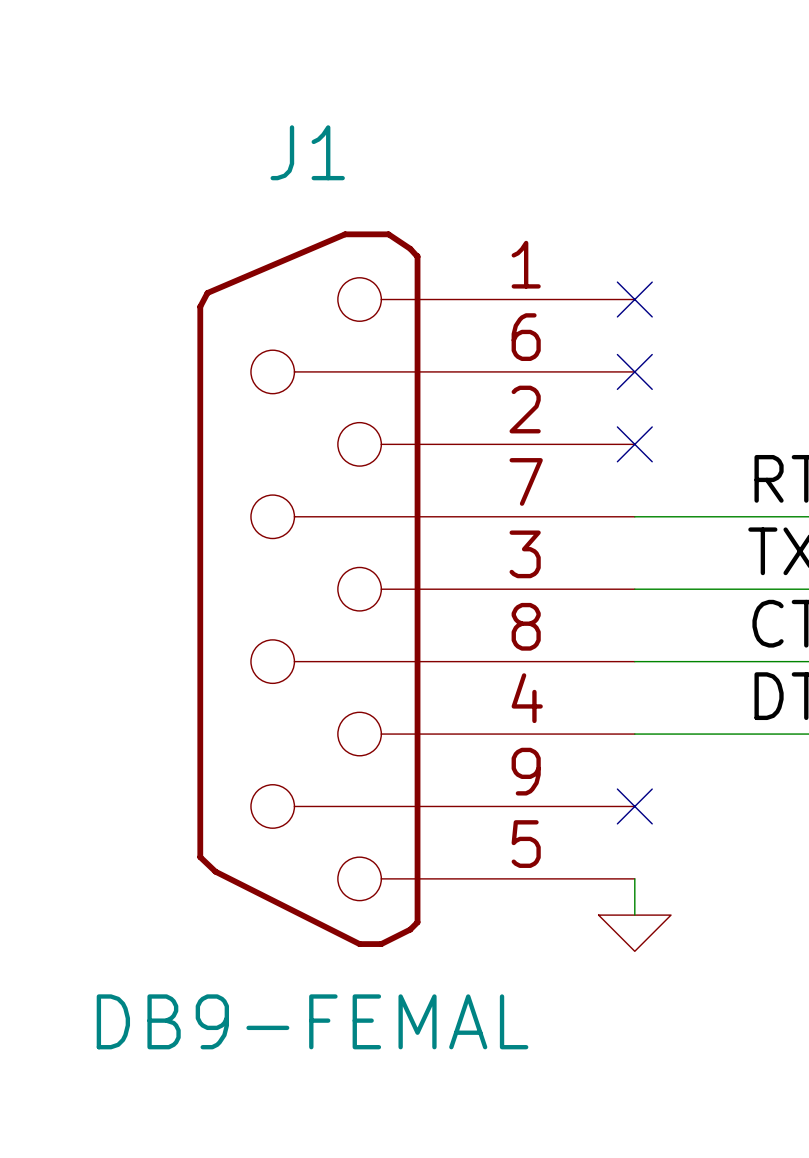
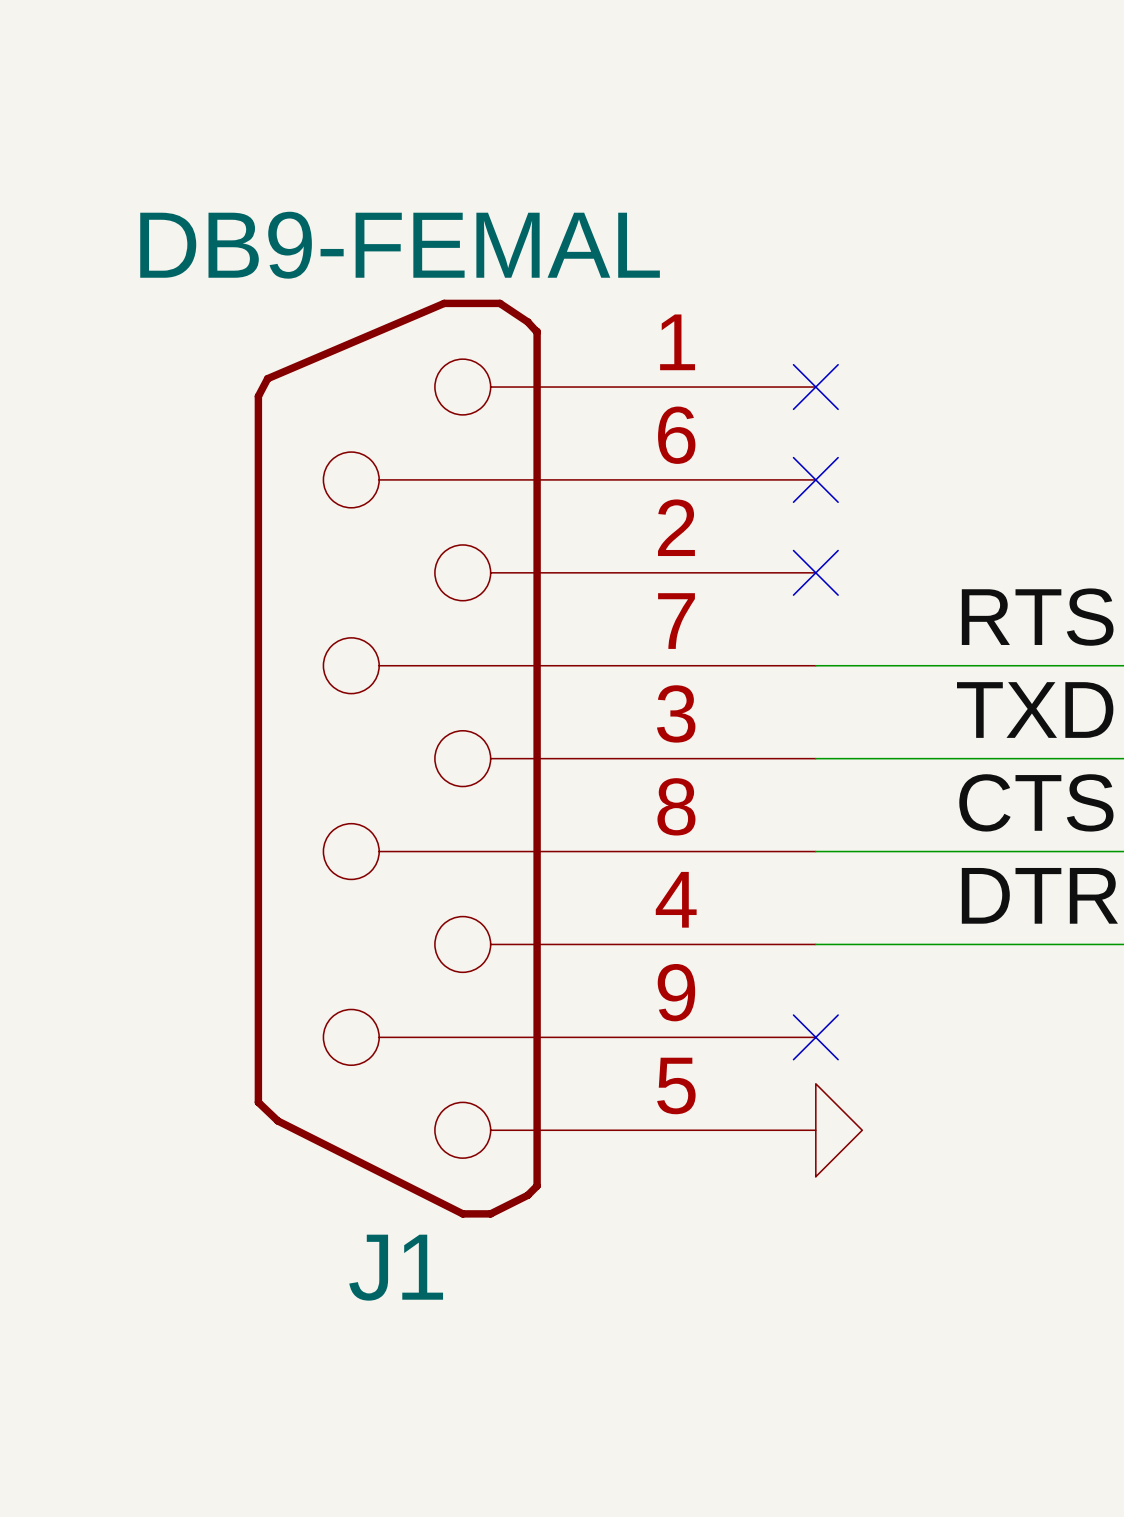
J1 name position: J1 (307, 152) -> J1 (396, 1267)
power symbol rotation: 0° (634, 933) -> 90° counterclockwise (839, 1130)
power symbol position: (634, 933) -> (839, 1130)
J1 value position: DB9-FEMAL (312, 1021) -> DB9-FEMAL (400, 245)

